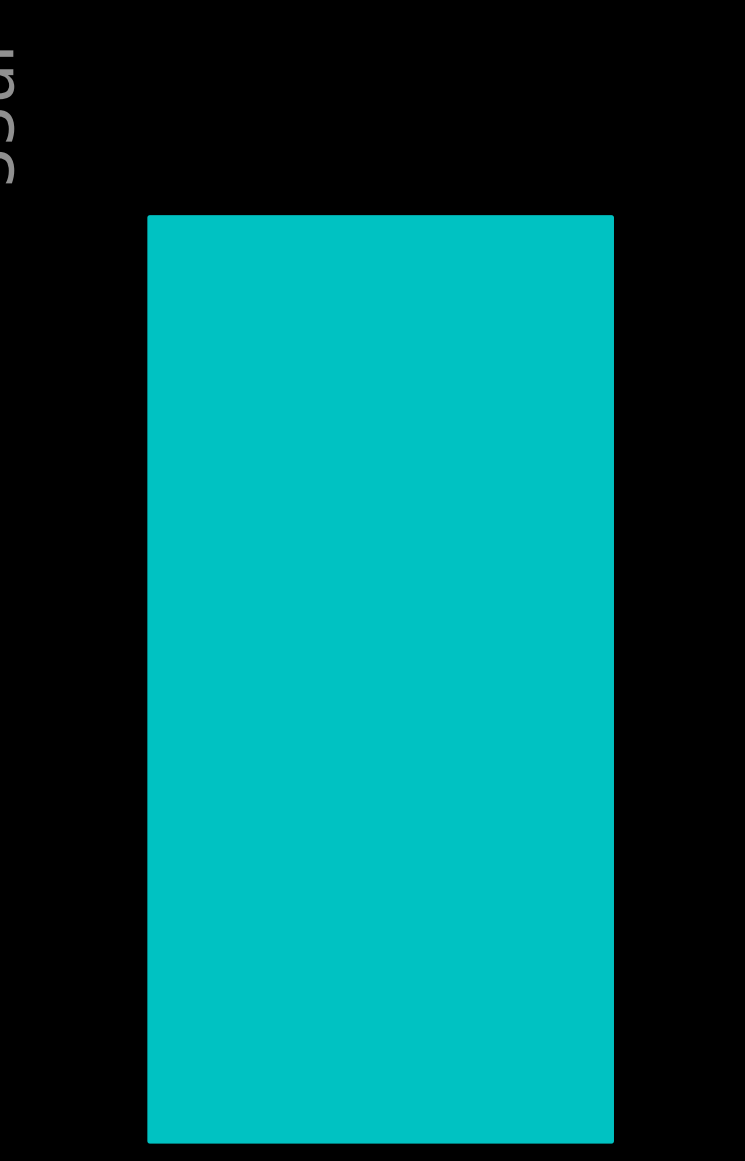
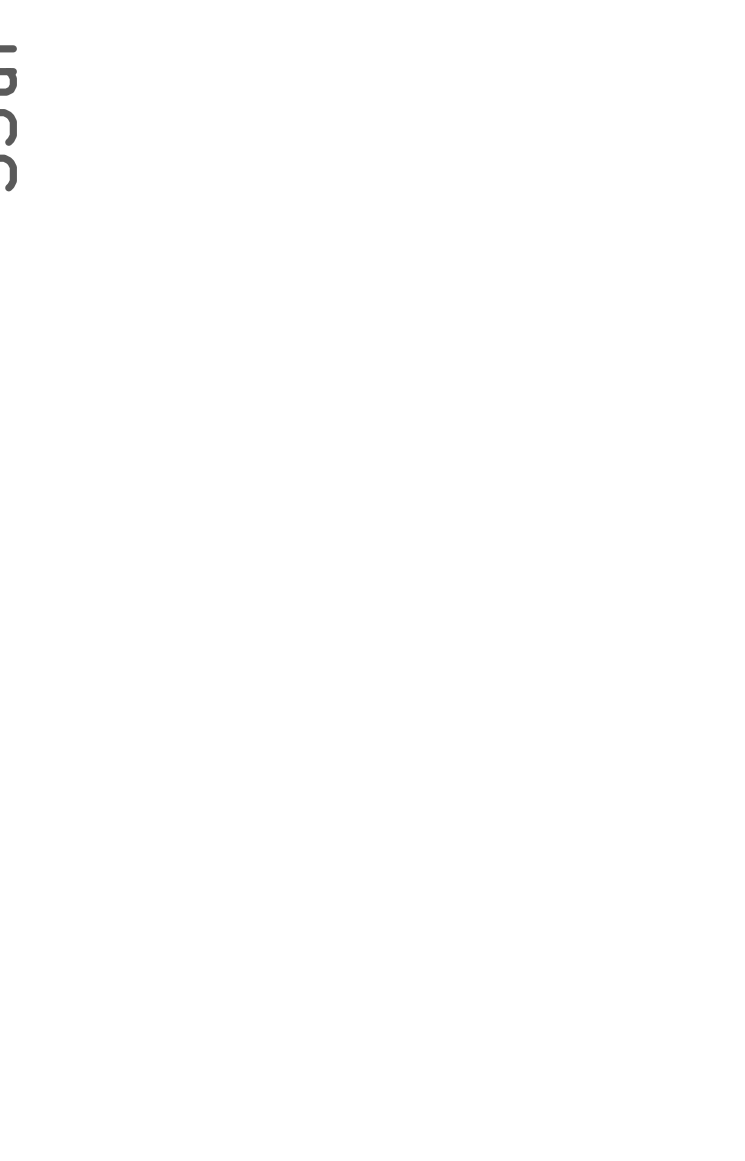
drawing: [147, 215, 614, 1144] -> none

